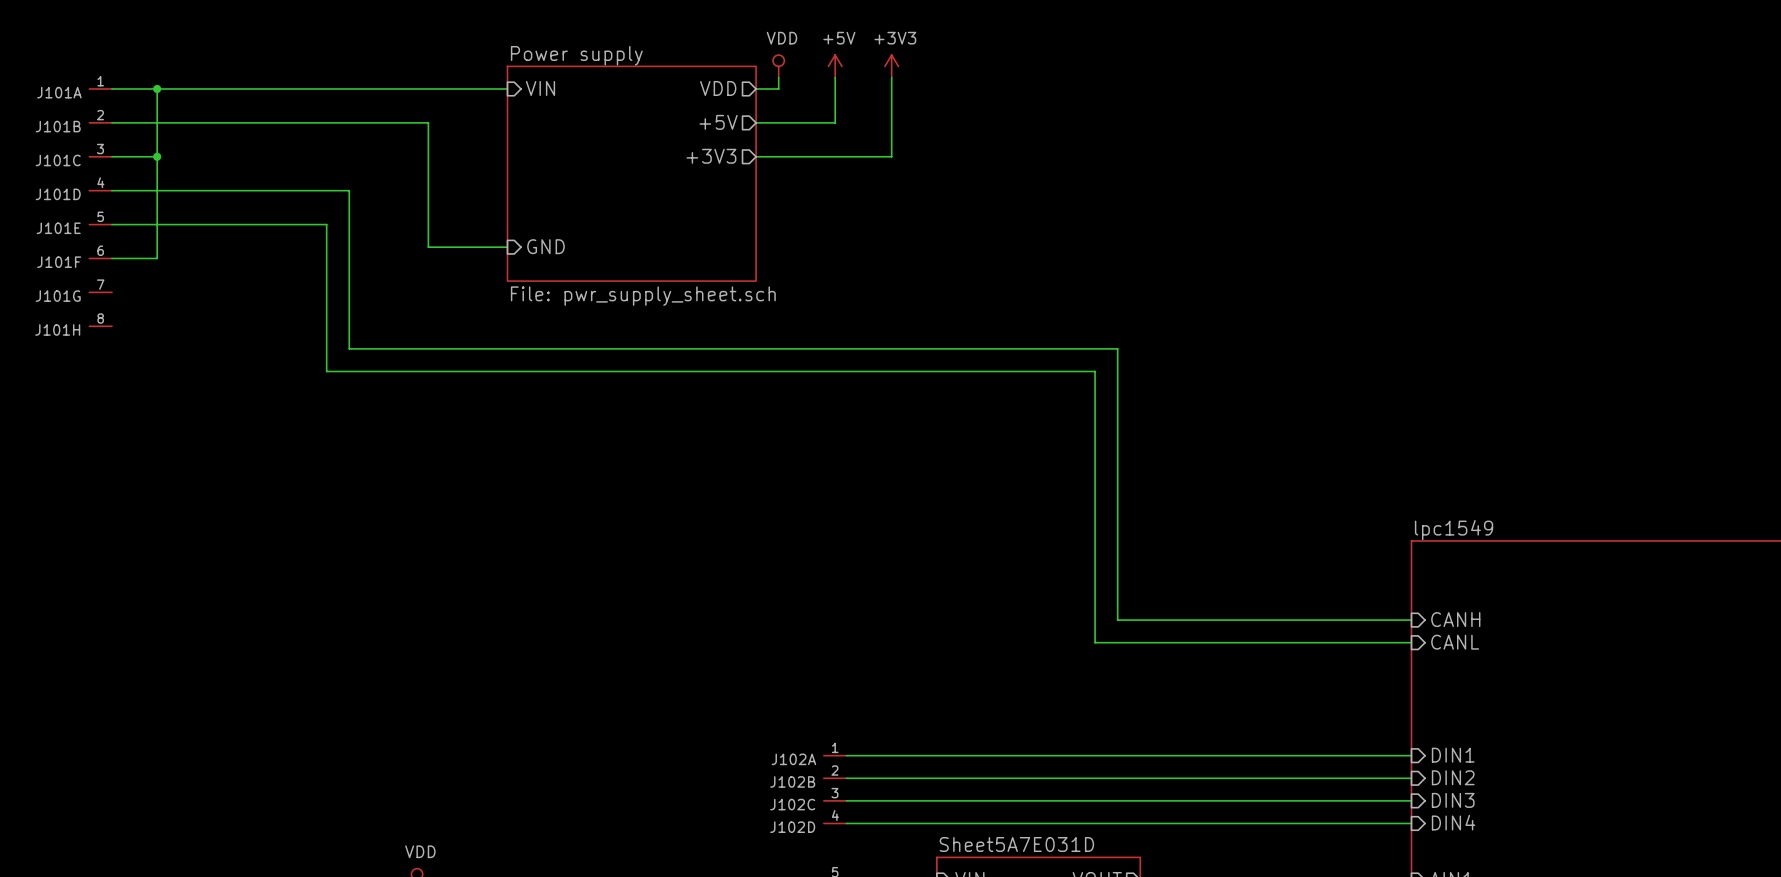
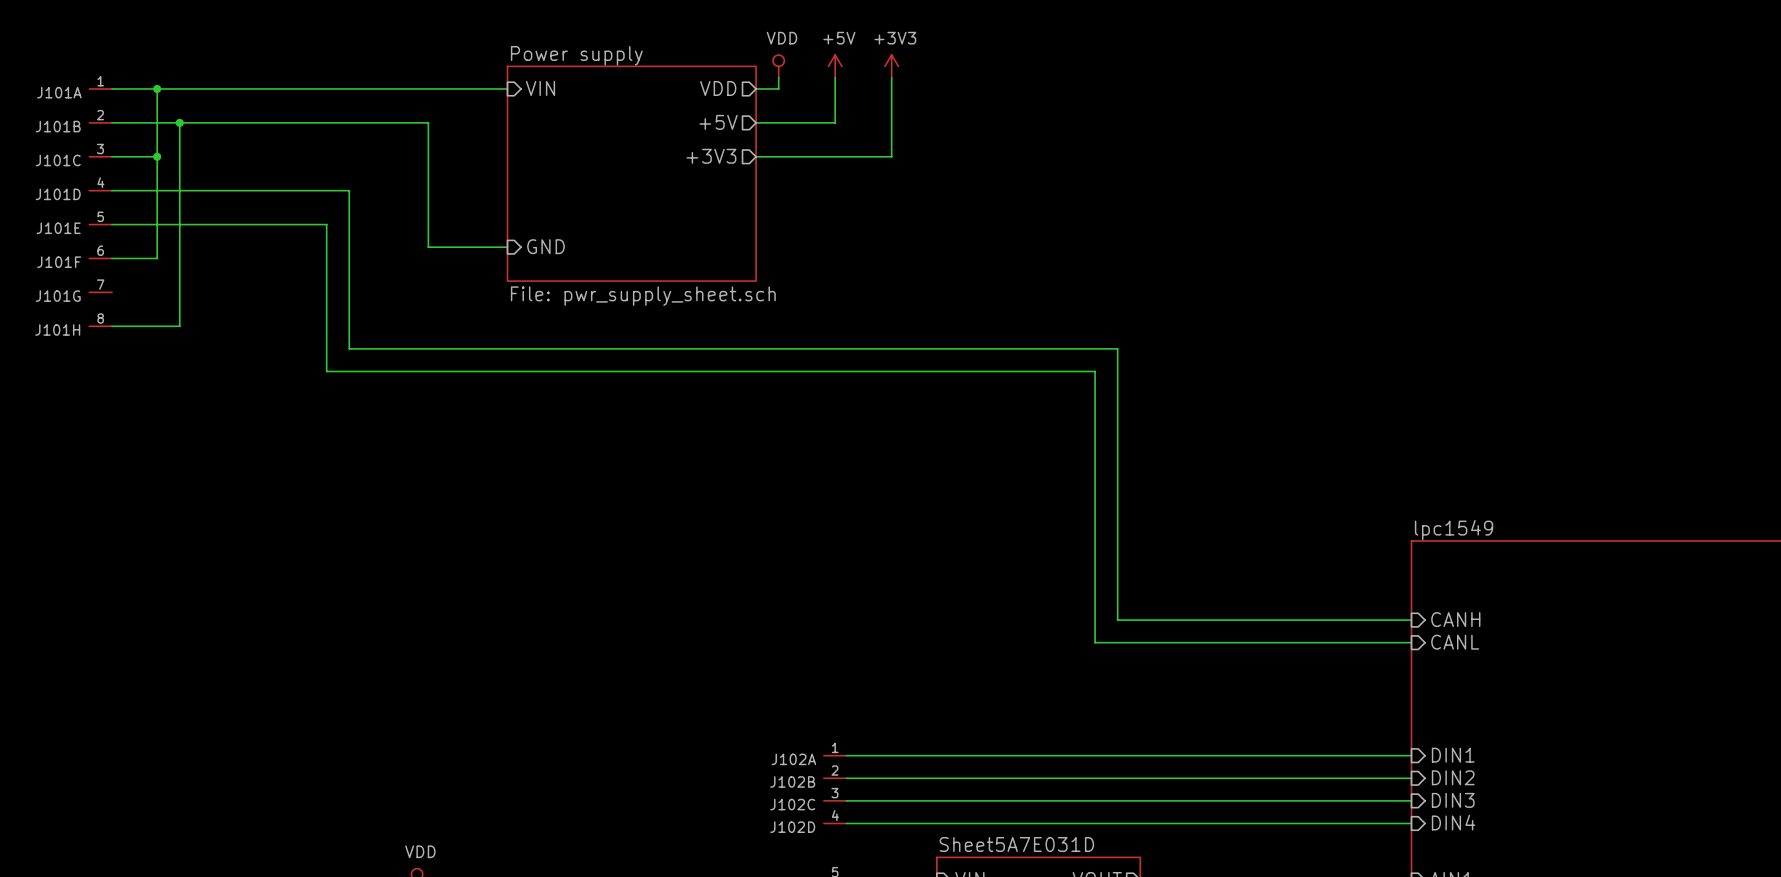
wire: none -> (179, 122) (179, 326) (111, 326)
junction: none -> (179, 122)

